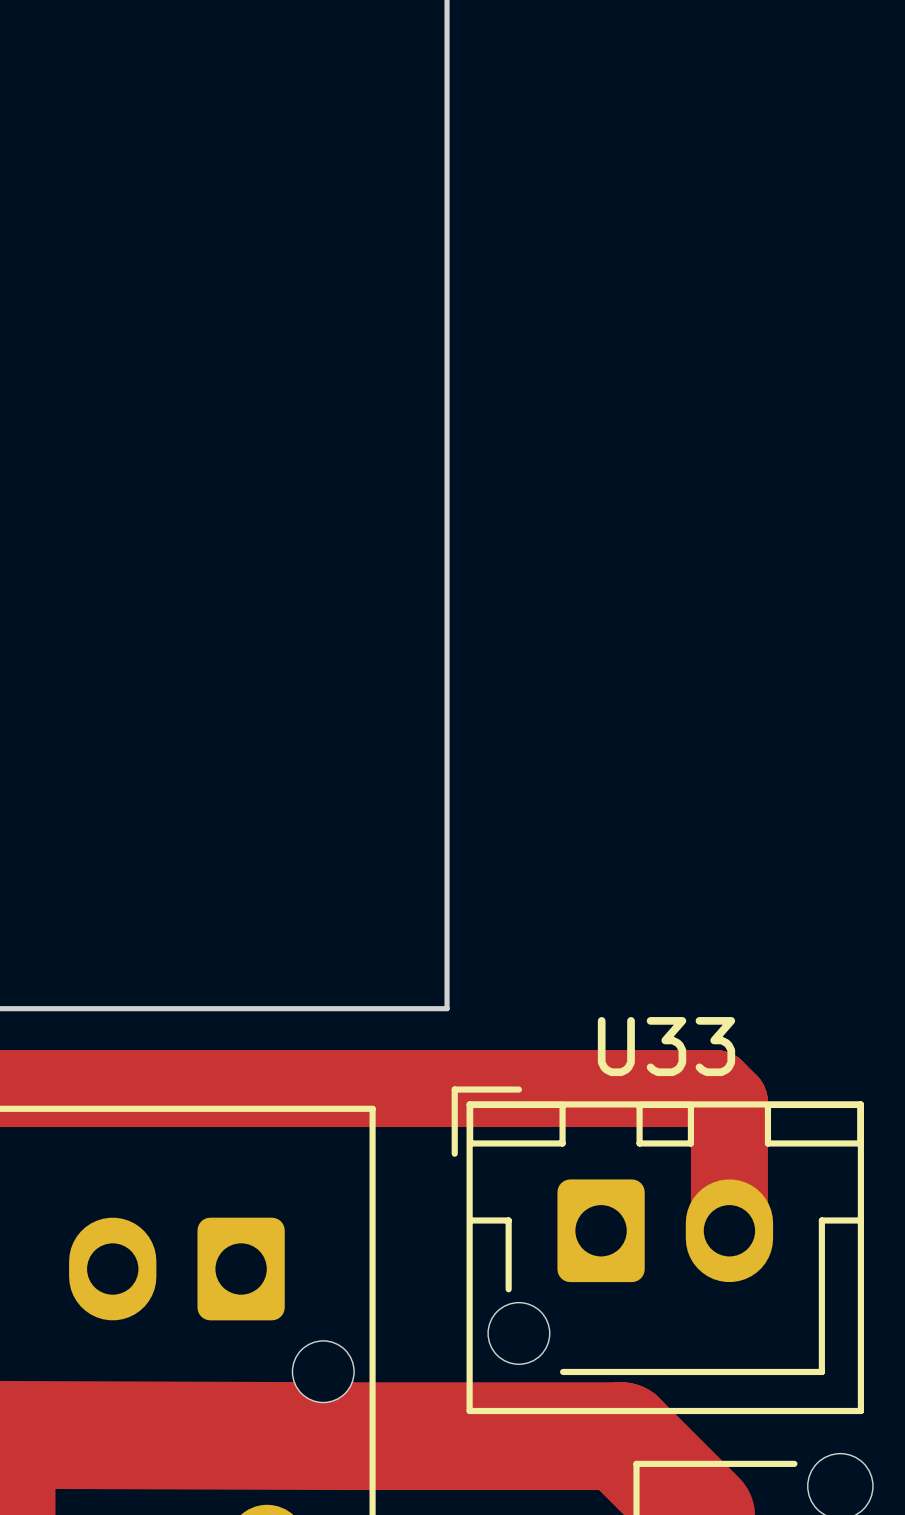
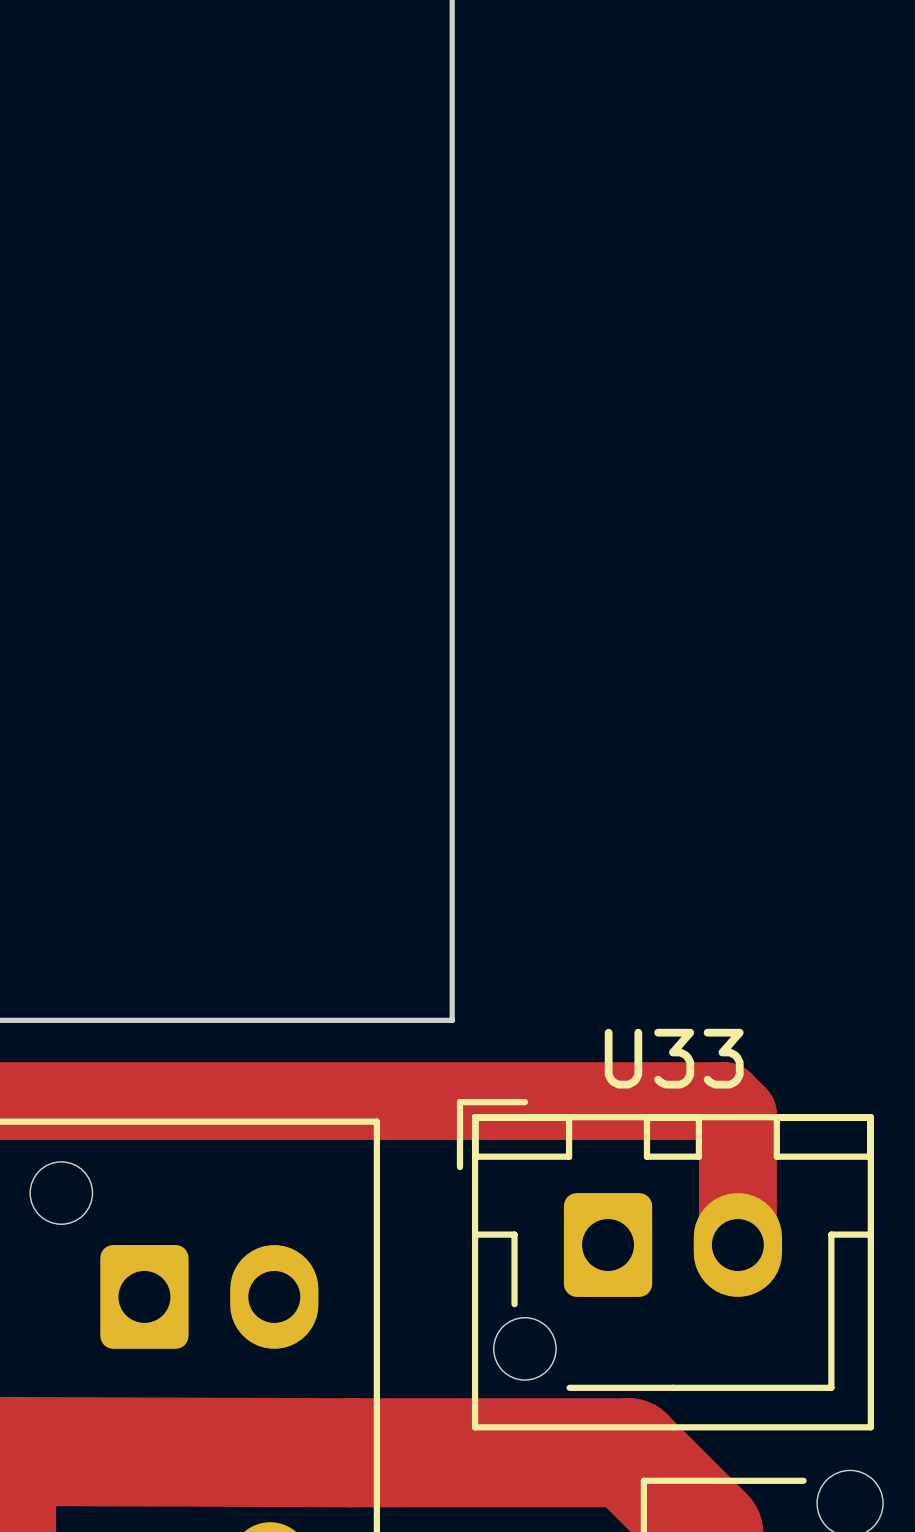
part rotation: 0° (211, 1310) -> 180° (174, 1255)

